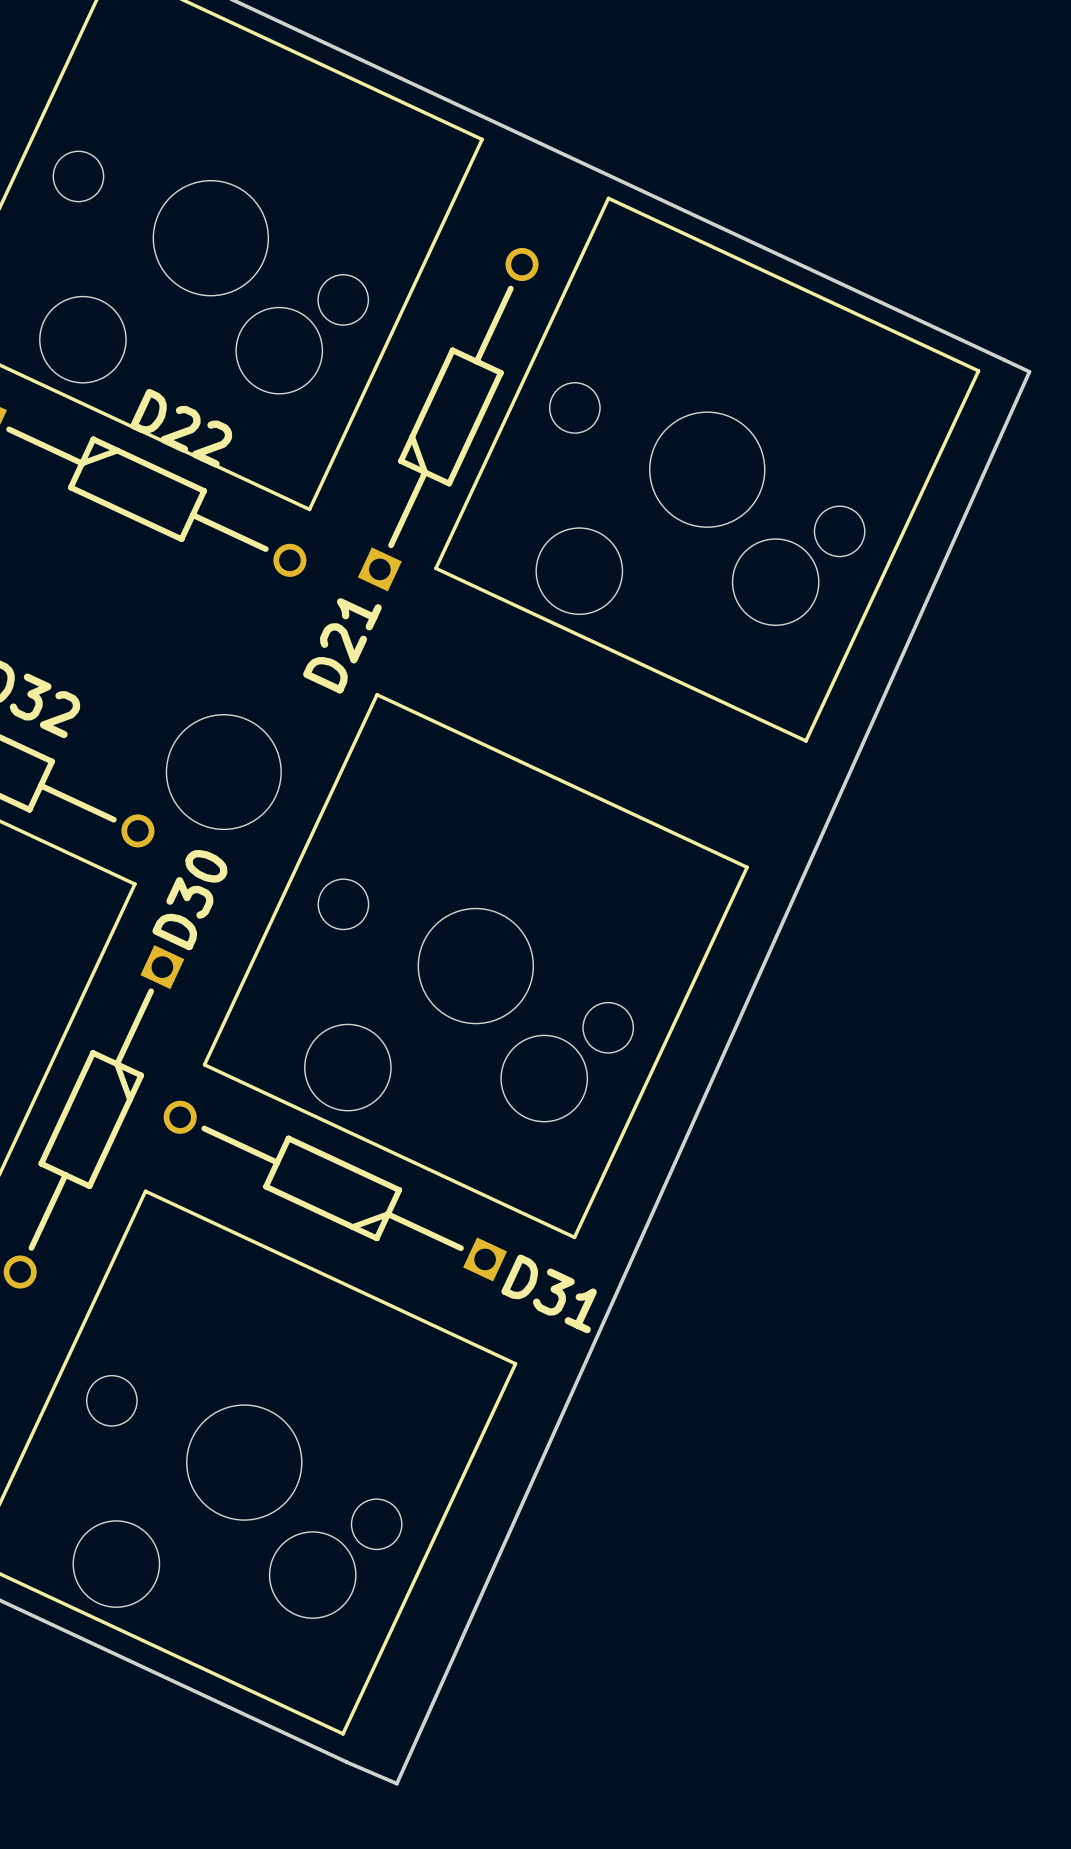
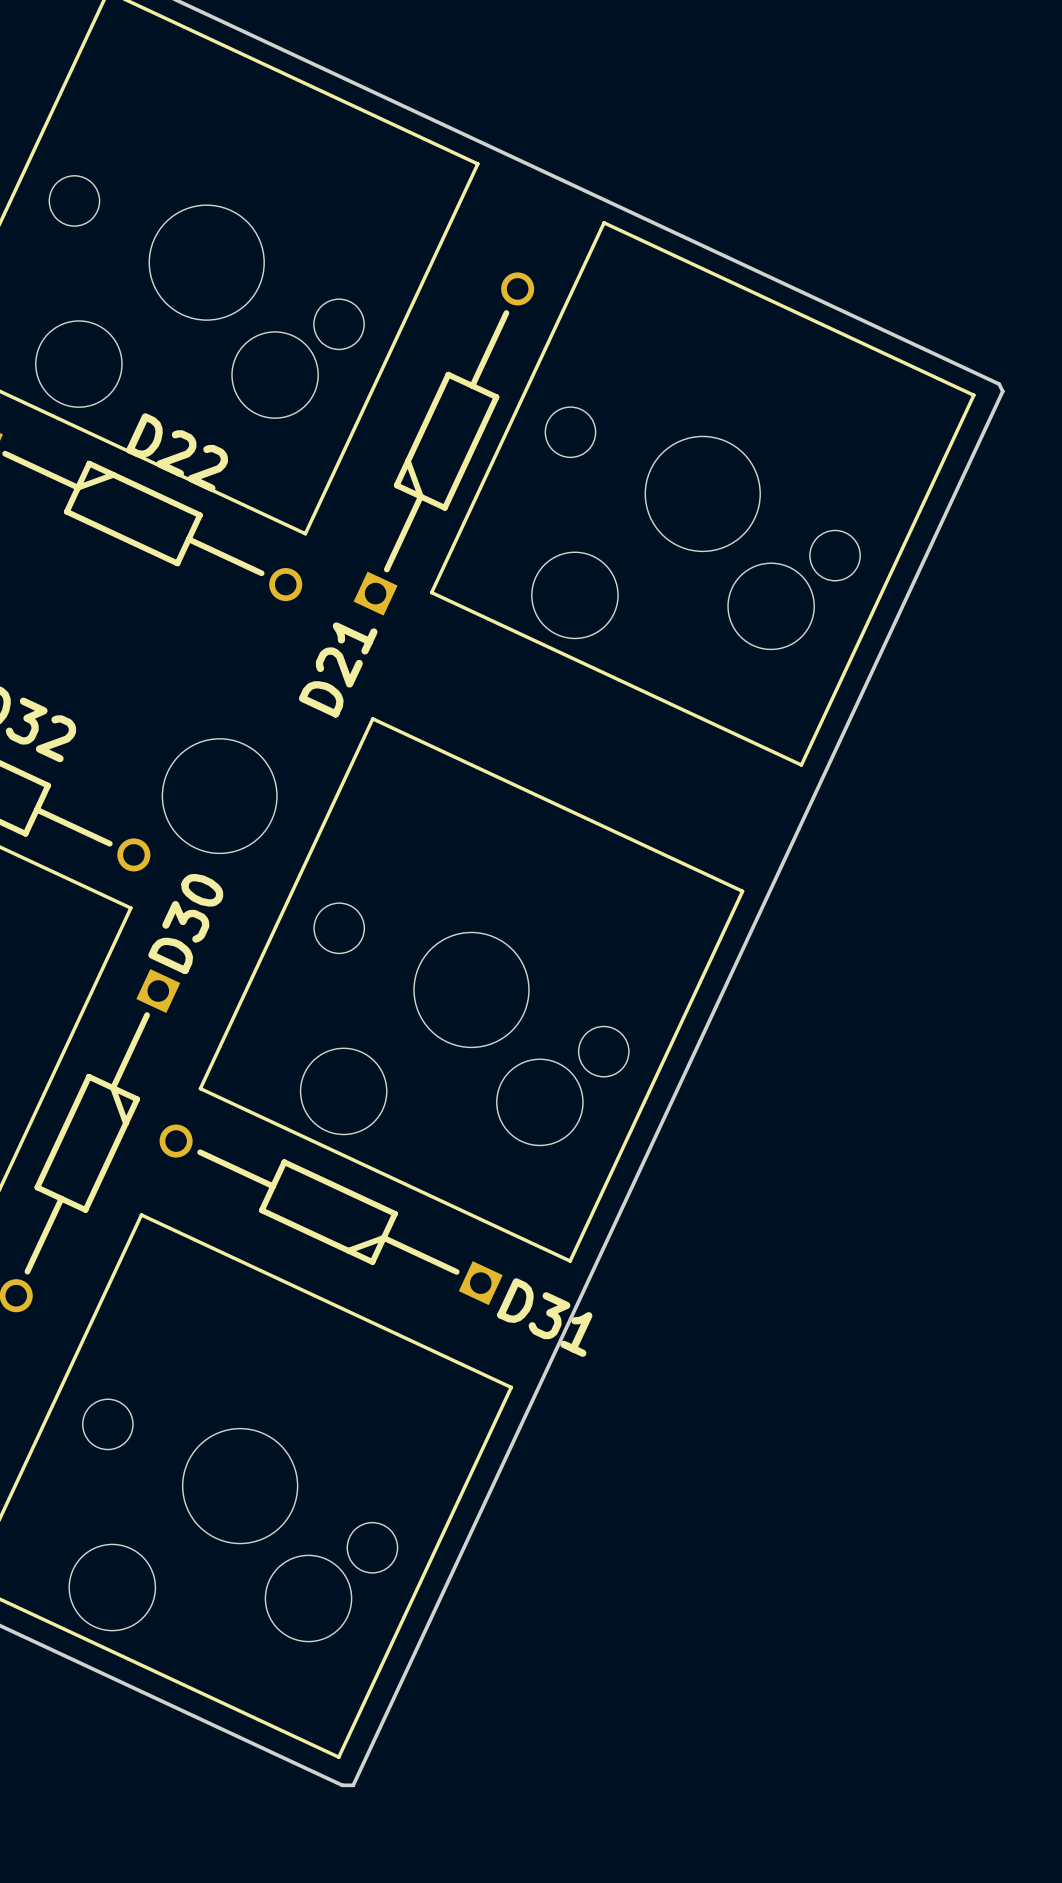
board edge: (1003, 359) (1029, 371) (396, 1783) (346, 1762) -> (999, 384) (1002, 391) (353, 1785) (342, 1785)

